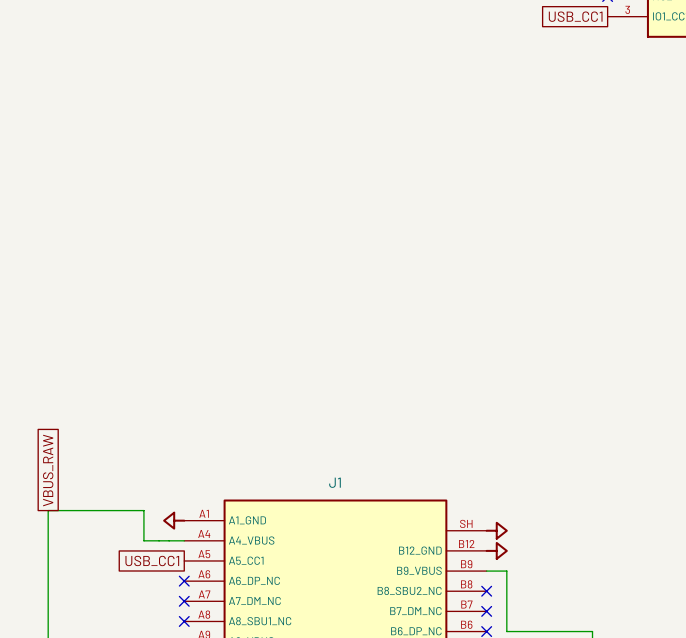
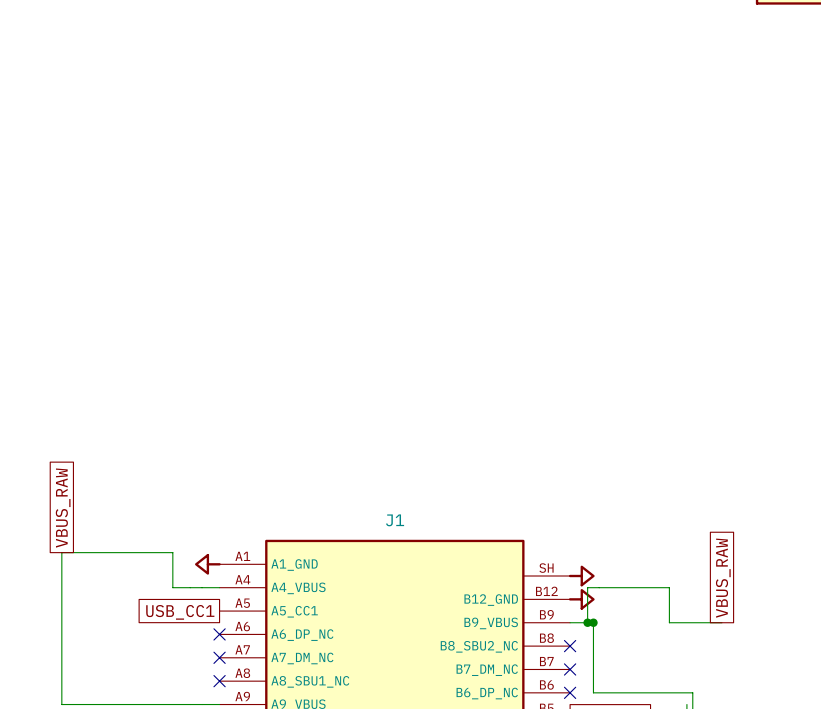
global label: none -> VBUS_RAW (723, 578)
wire: none -> (587, 622) (587, 587) (669, 587) (669, 622) (721, 622)
junction: none -> (587, 622)
junction: none -> (593, 622)

